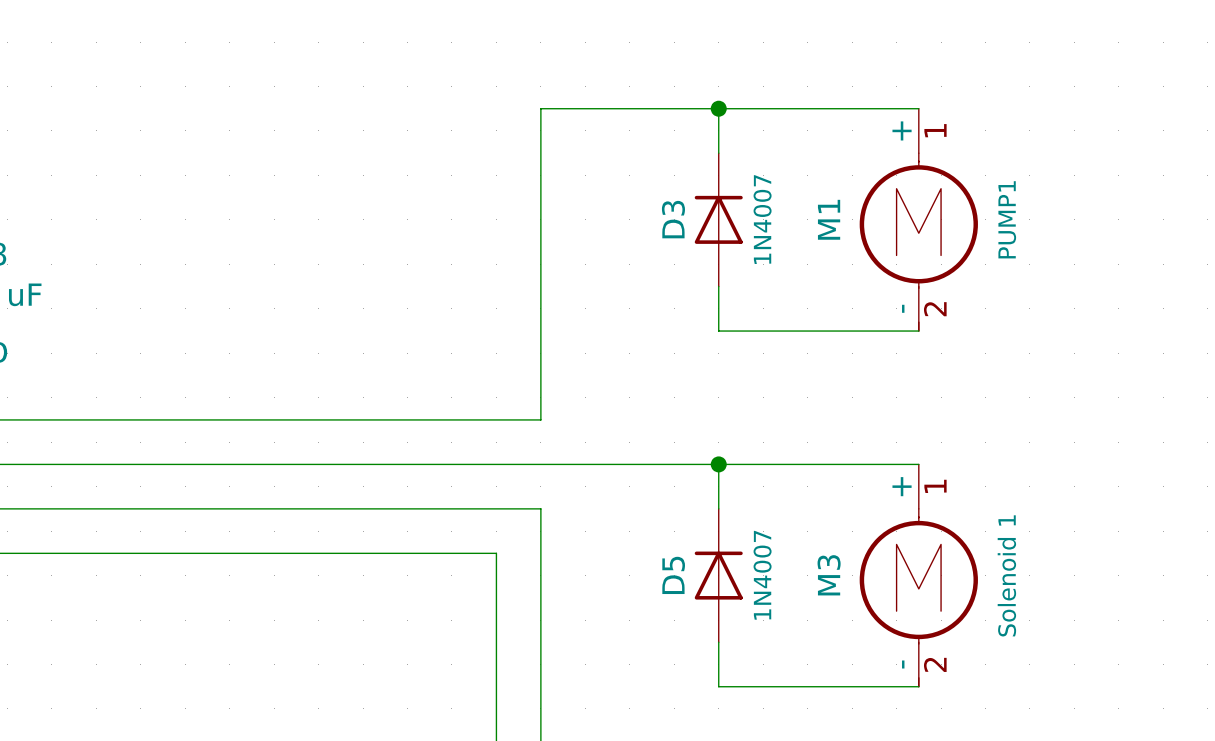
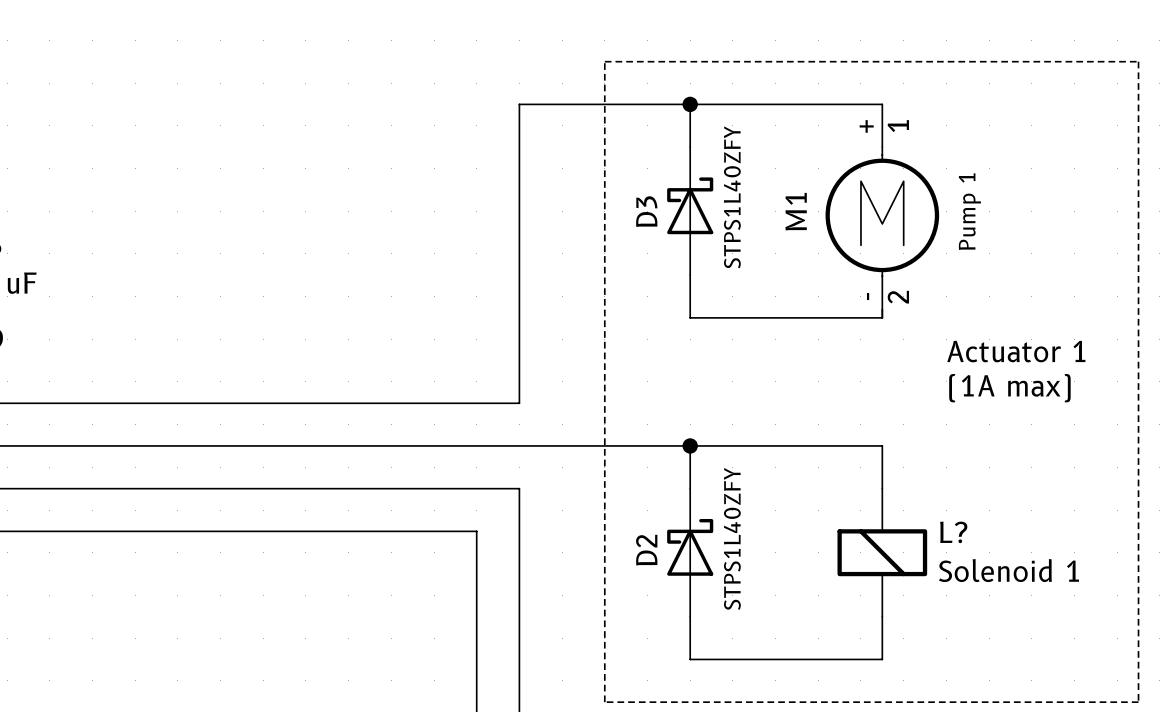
line: none -> (604, 61) (604, 702) (1138, 702) (1138, 61) (604, 61)
D3 symbol: [694, 153, 743, 287] -> [667, 147, 714, 276]
D3 value: 1N4007 (762, 219) -> STPS1L40ZFY (732, 197)
M1 value: PUMP1 (1007, 219) -> Pump 1 (969, 211)
text: none -> Actuator 1 (1016, 351)
text: none -> (1A max) (1009, 388)
D5: 1N4007 (718, 575) -> none
D2: none -> STPS1L40ZFY (690, 552)
M3: Solenoid 1 (918, 575) -> none
L?: none -> Solenoid 1 (882, 552)

